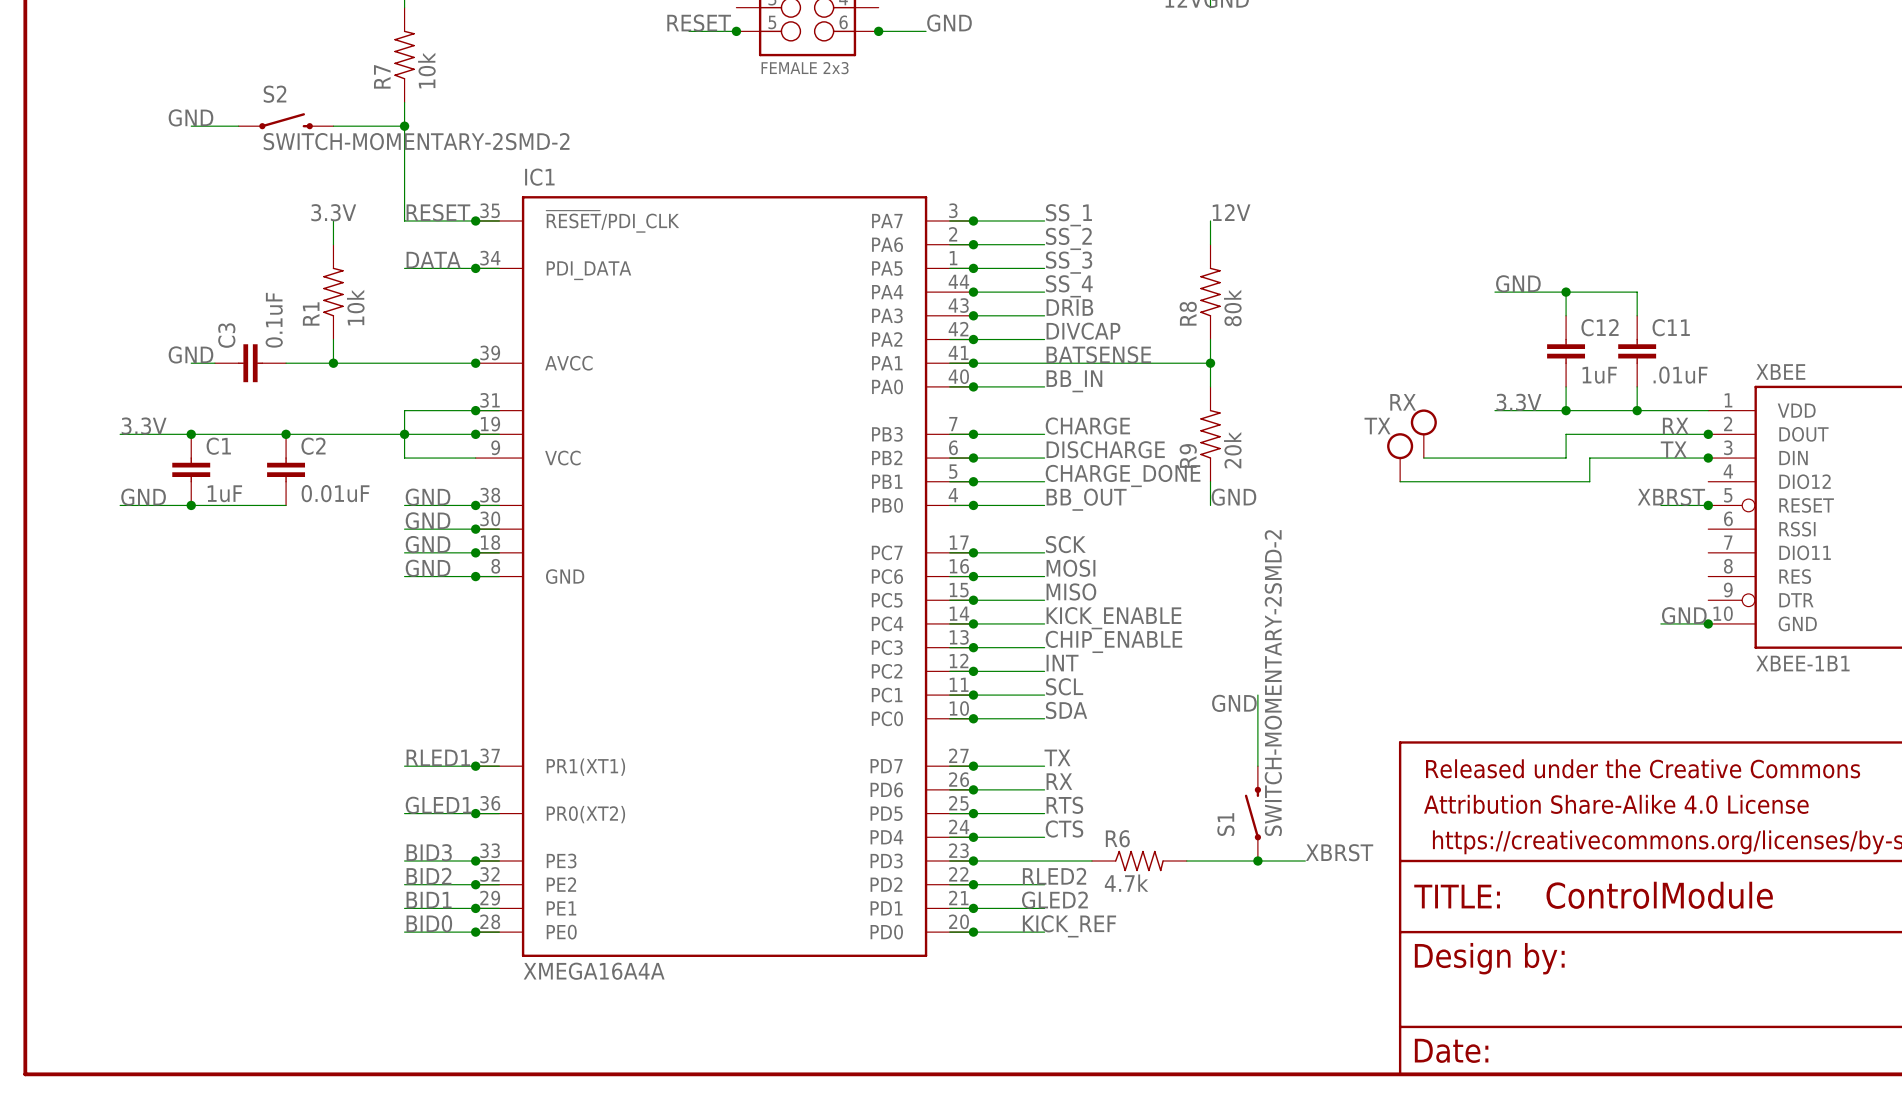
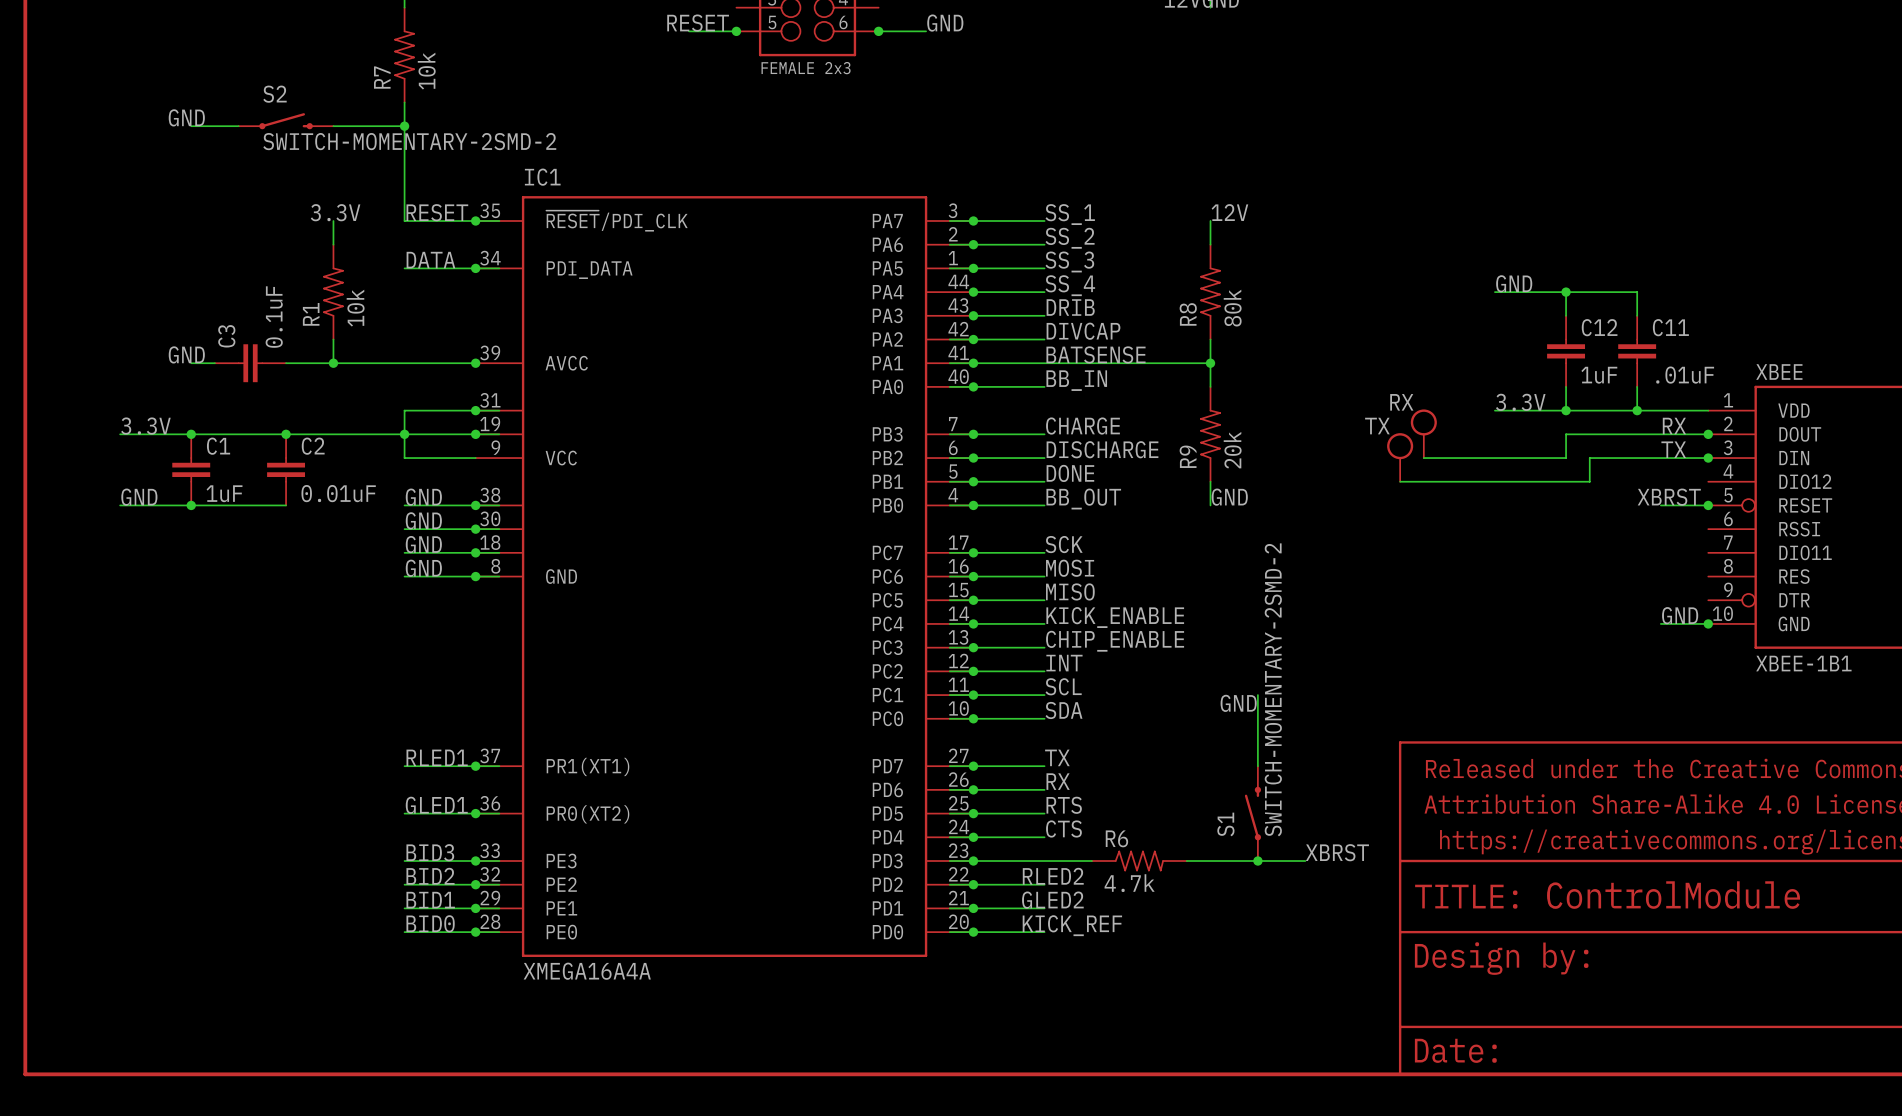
label: CHARGE_DONE (1123, 475) -> DONE (1070, 473)

